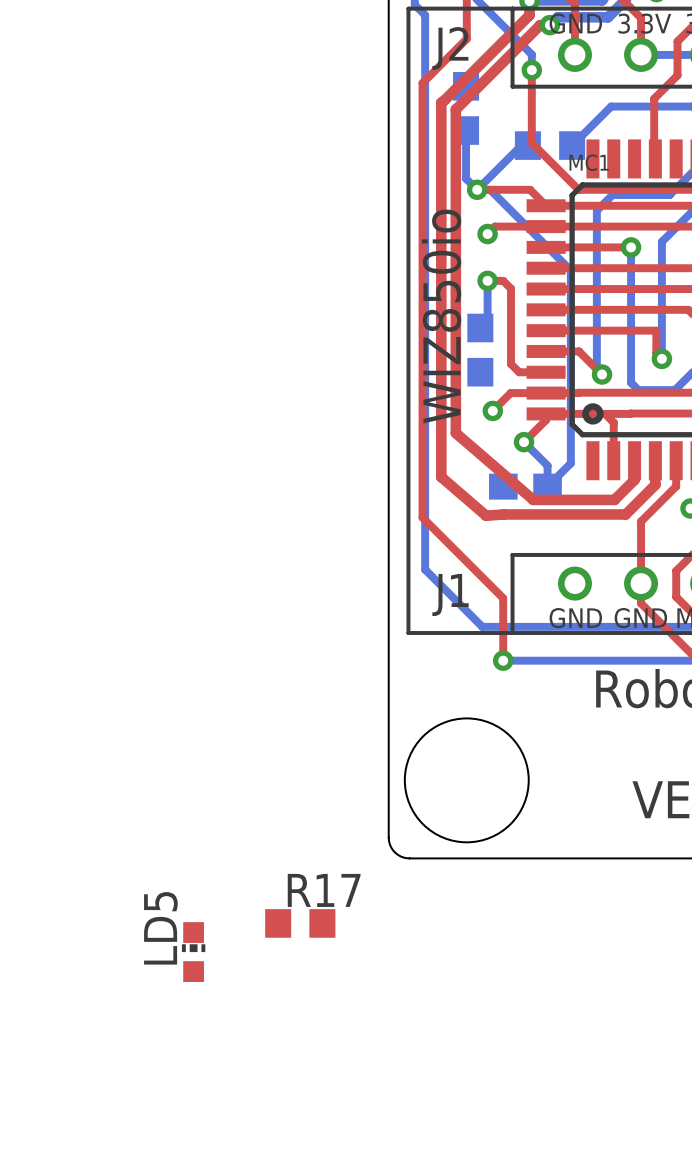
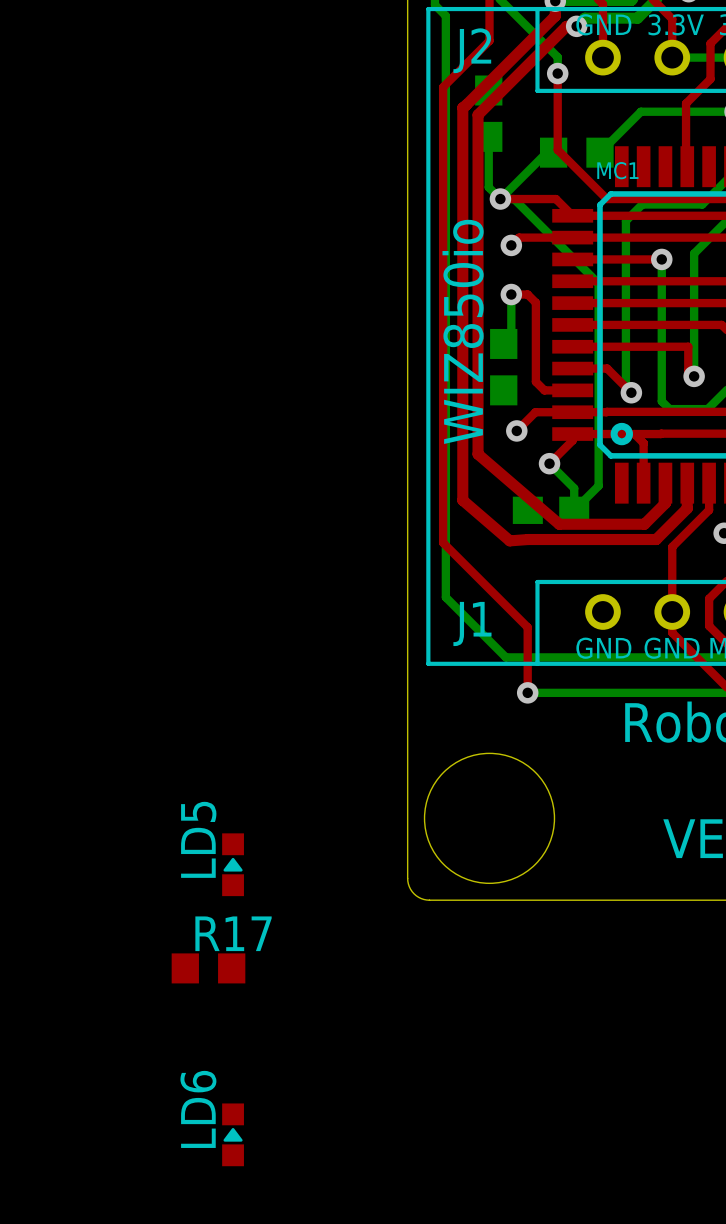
LD5 footprint: [181, 922, 206, 982] -> [222, 833, 244, 897]
R17 position: (300, 923) -> (208, 968)
LD6: none -> (233, 1134)

